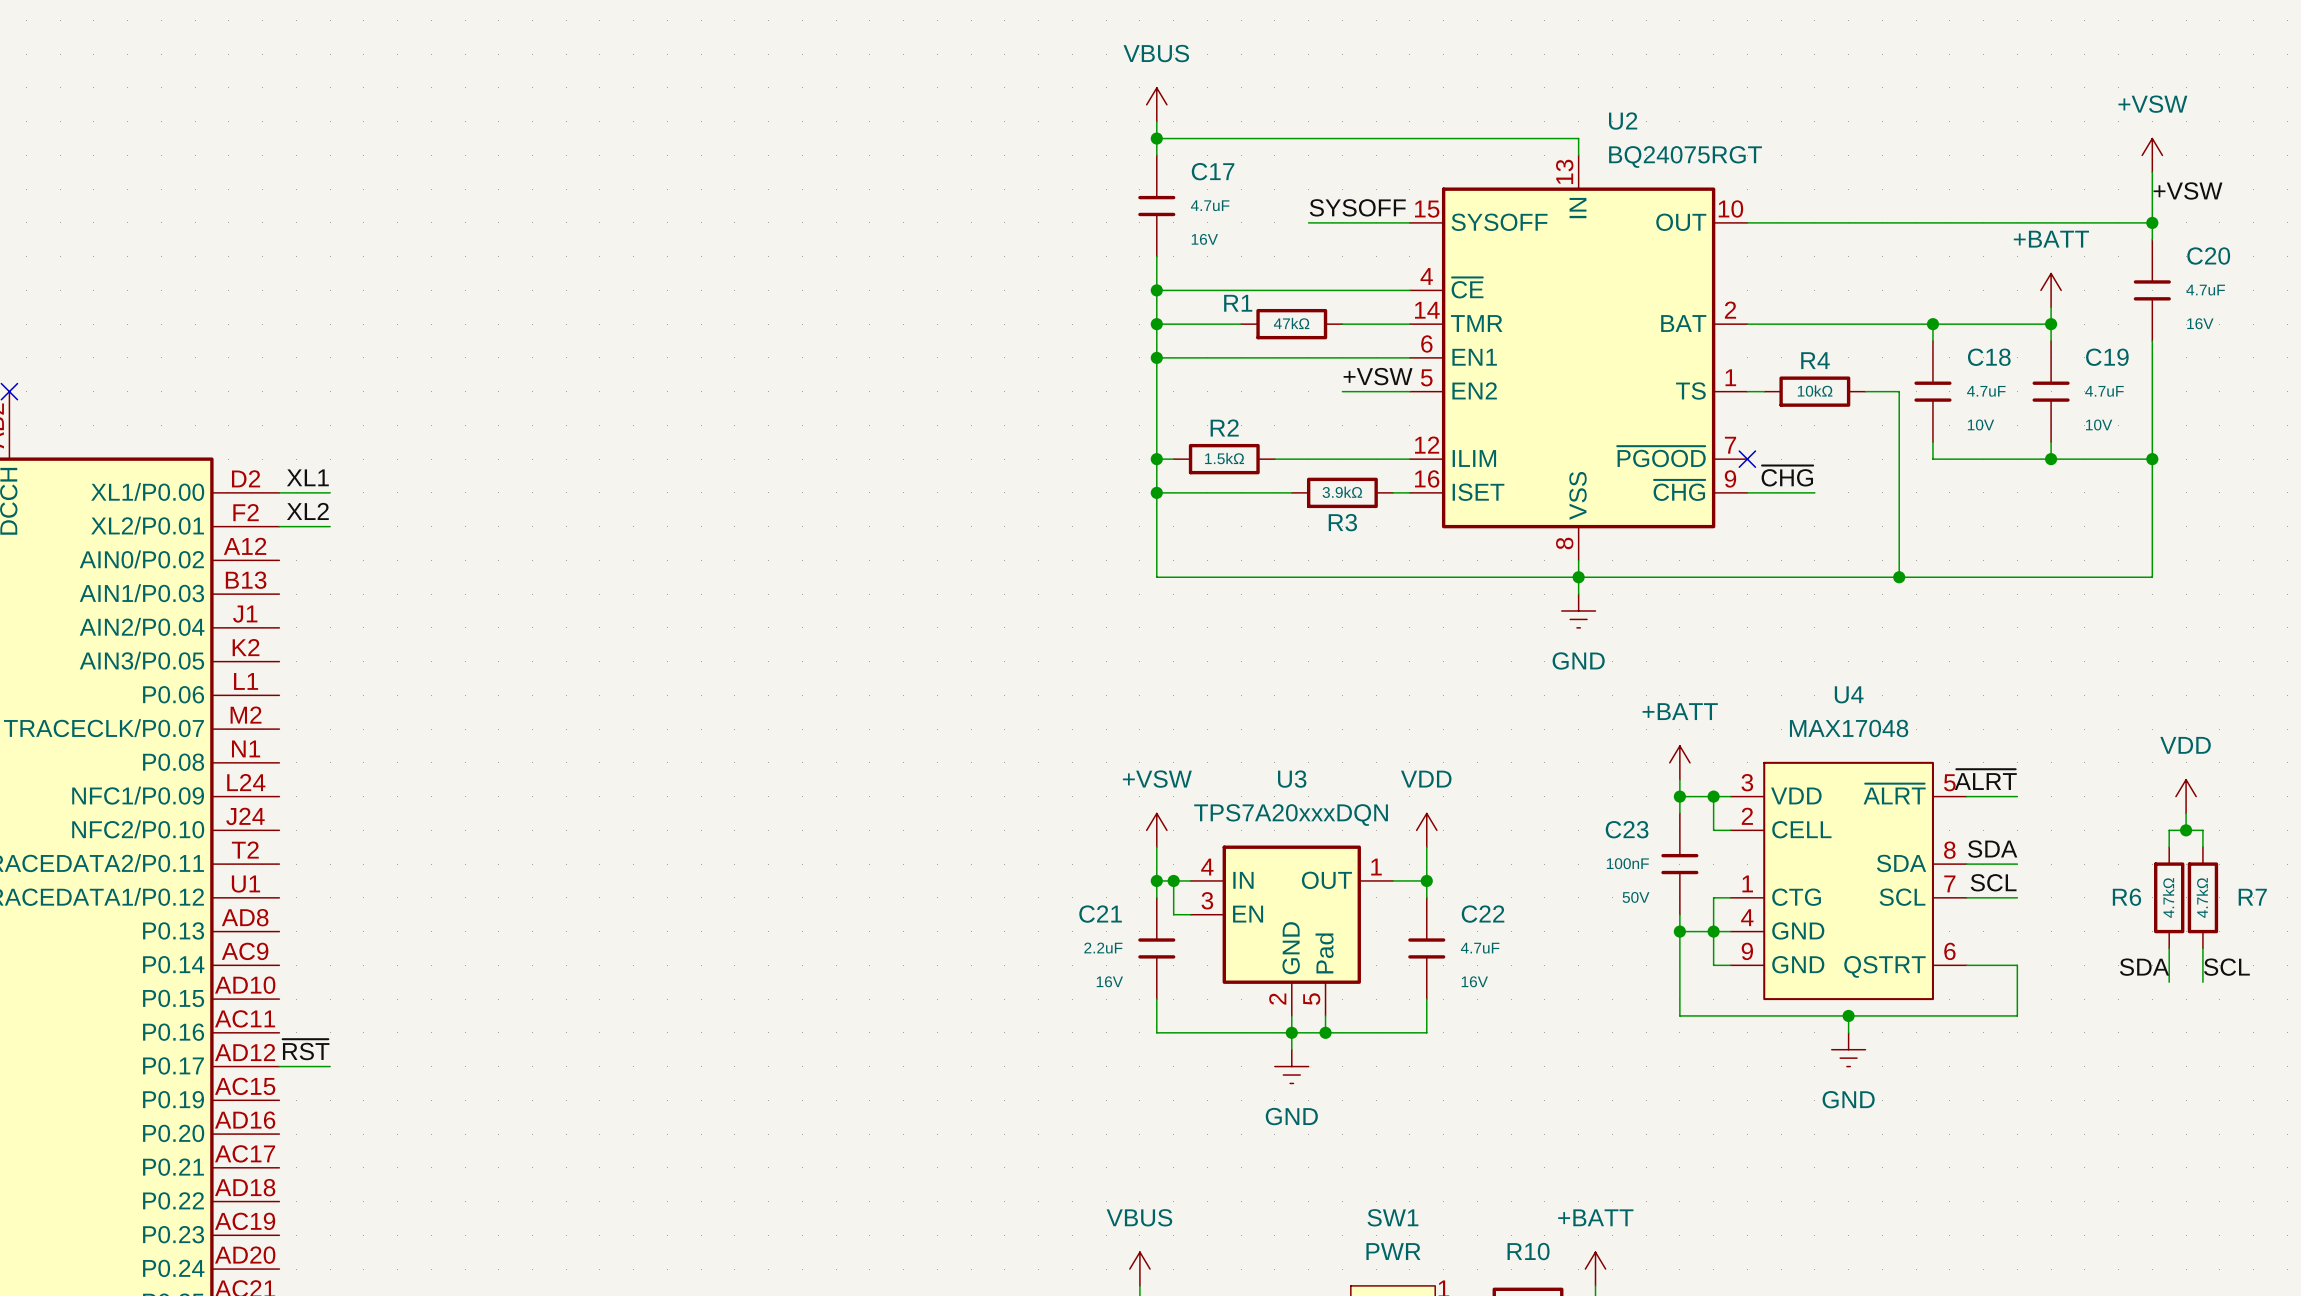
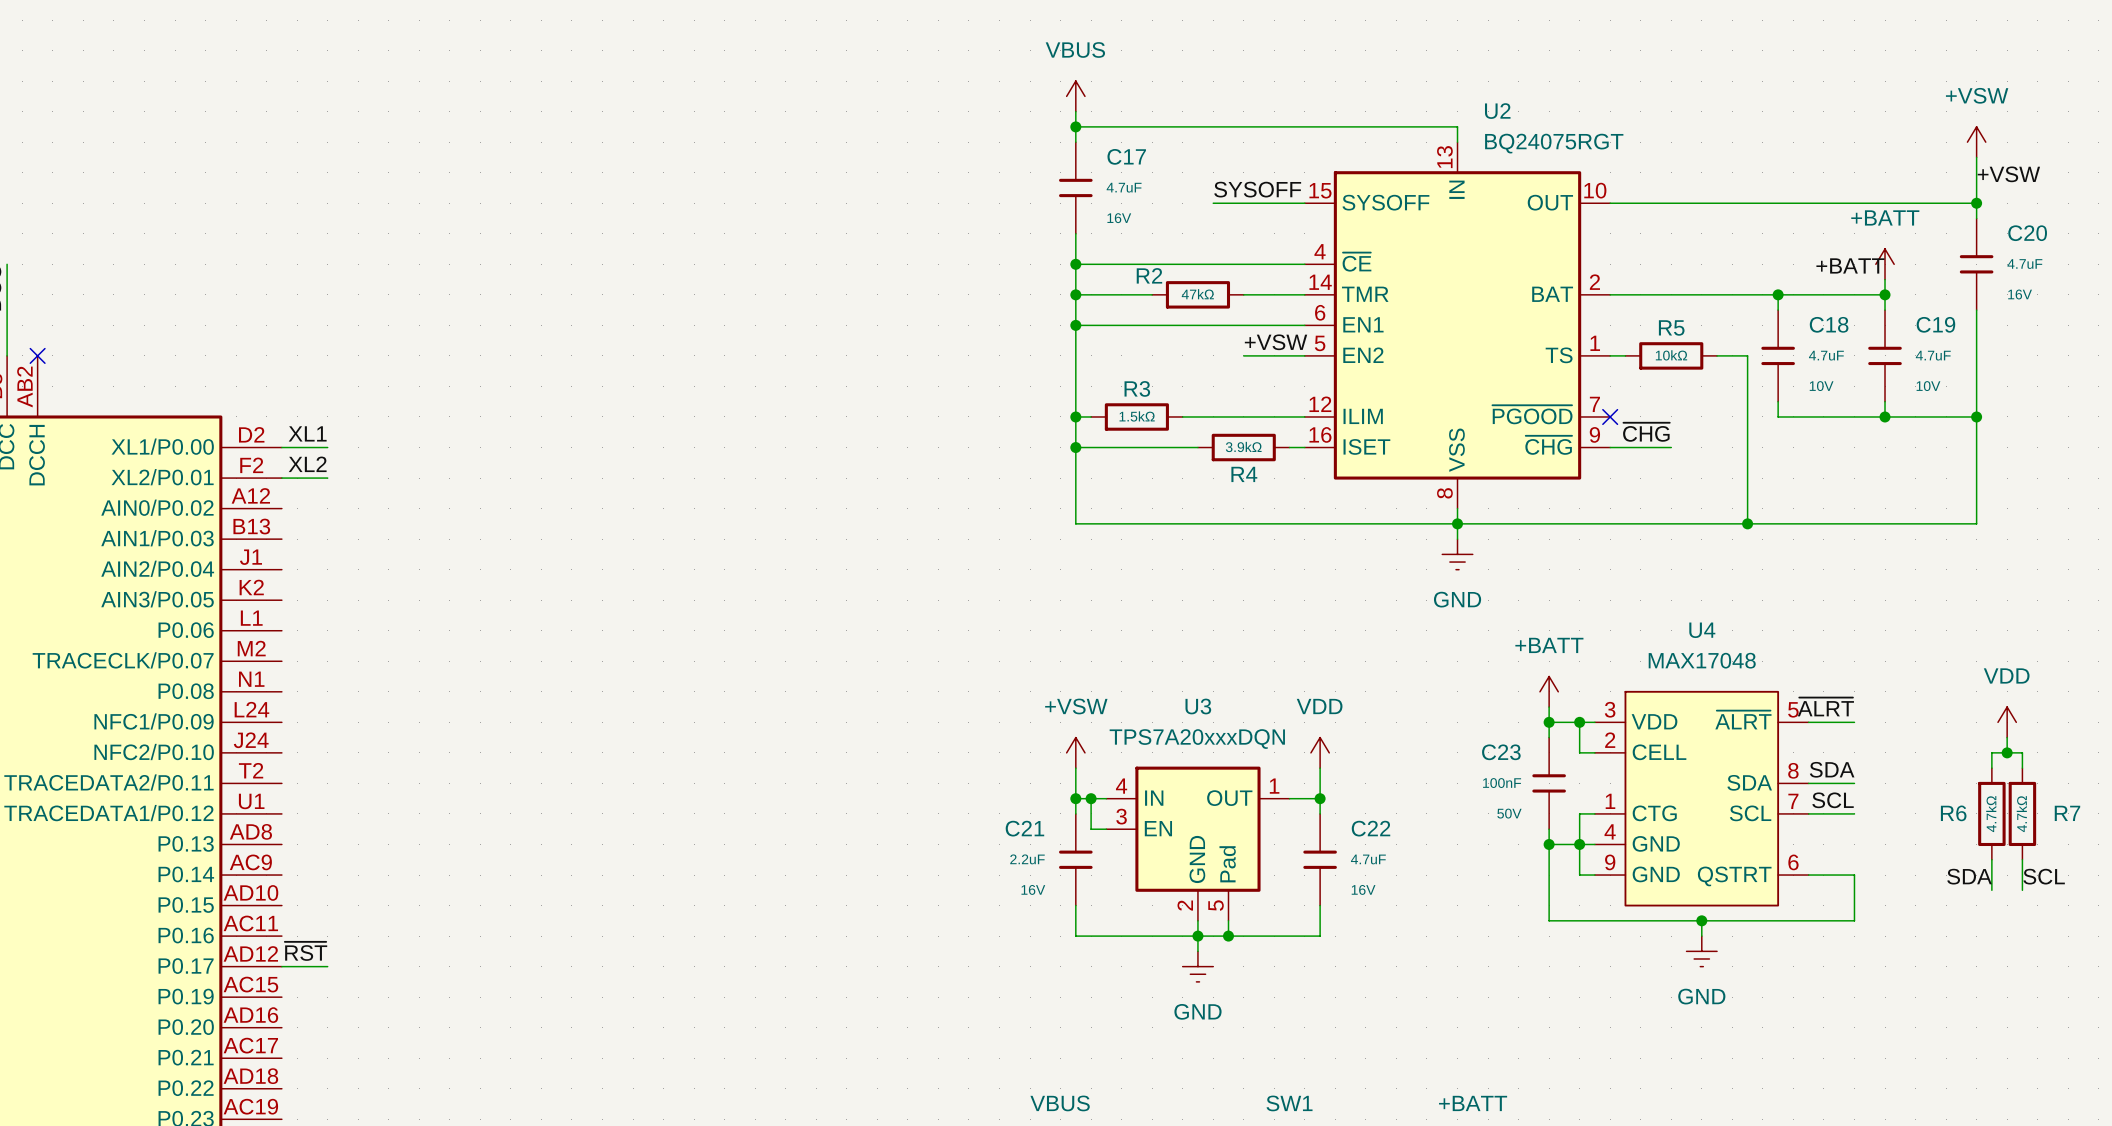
label: none -> +BATT (1850, 265)
R1 name: R1 (1238, 303) -> R2 (1149, 275)
R4 name: R4 (1815, 360) -> R5 (1671, 327)
R2 name: R2 (1224, 428) -> R3 (1137, 388)
R3 name: R3 (1342, 522) -> R4 (1244, 474)

